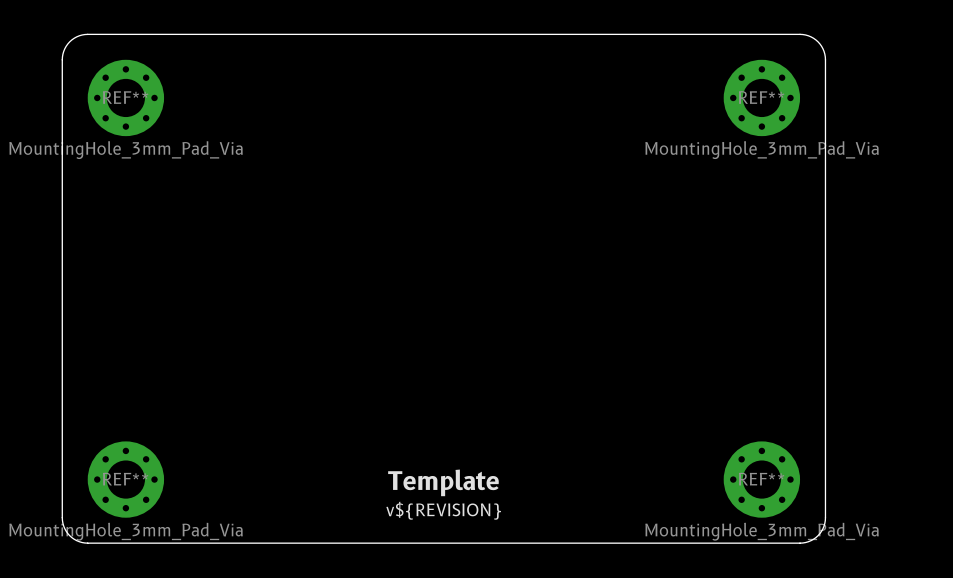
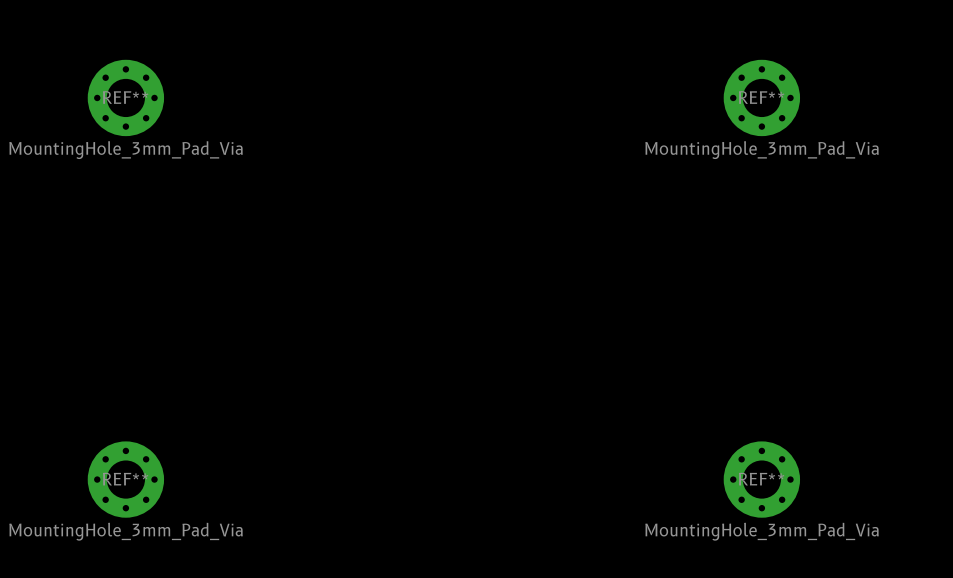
board edge: (87, 34) (800, 34) (813, 38) (821, 46) (825, 59) (825, 517) (821, 531) (811, 540) (800, 543) (87, 543) (74, 539) (66, 531) (62, 517) (62, 59) (63, 51) (69, 41) (76, 36) (87, 34) -> none
text: Template (443, 482) -> none
text: v${REVISION} (443, 510) -> none

